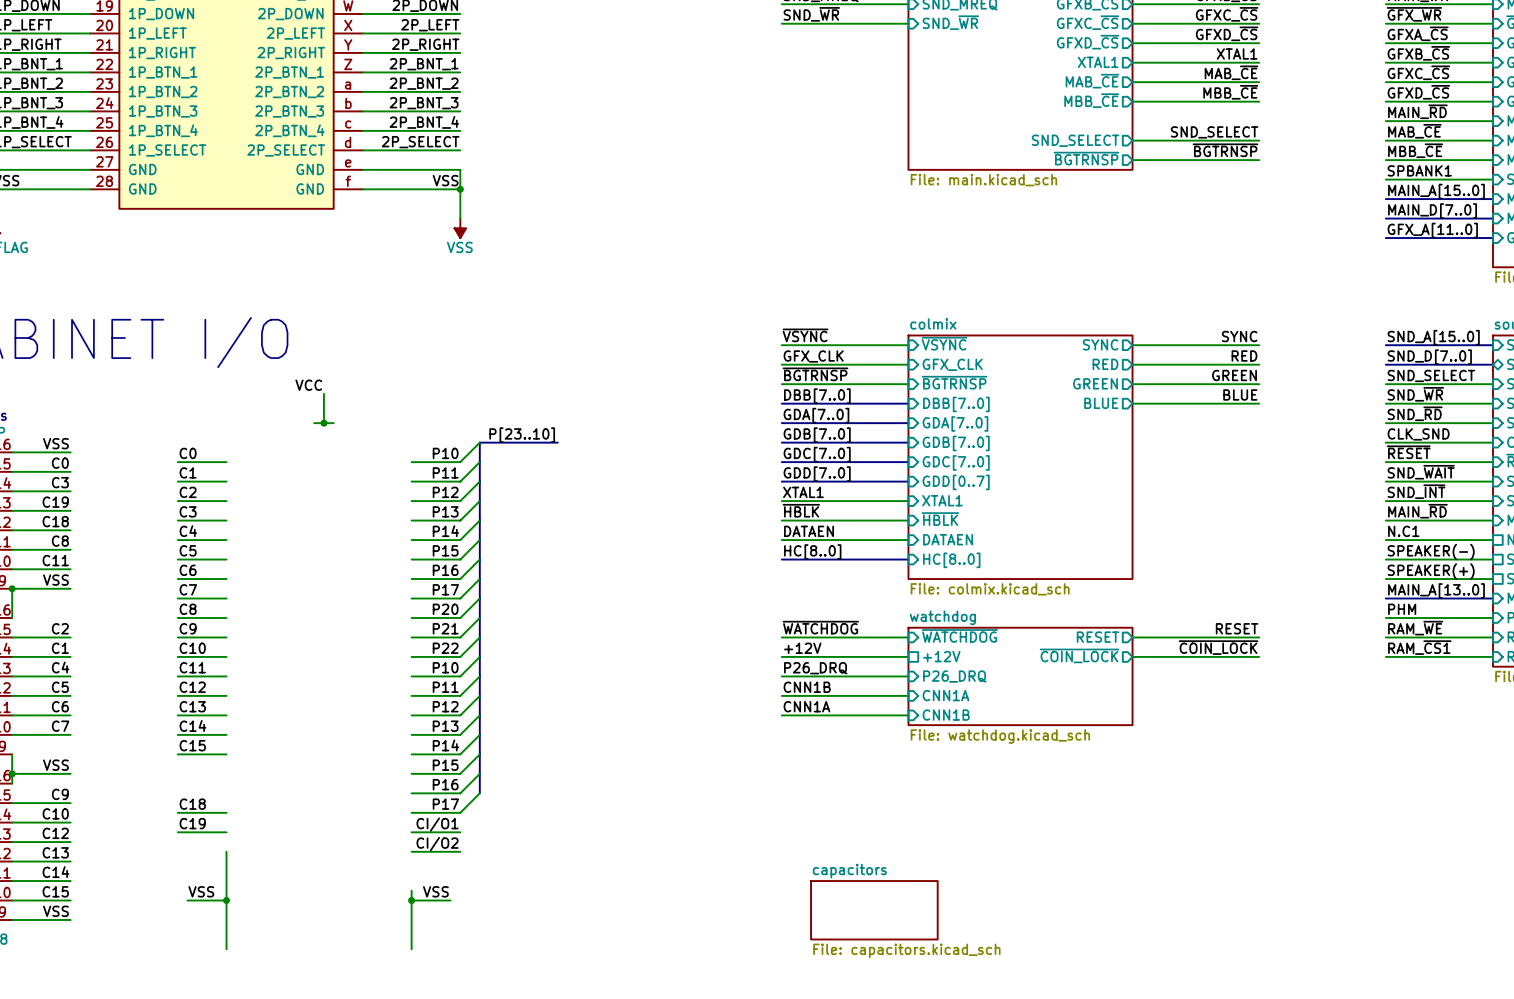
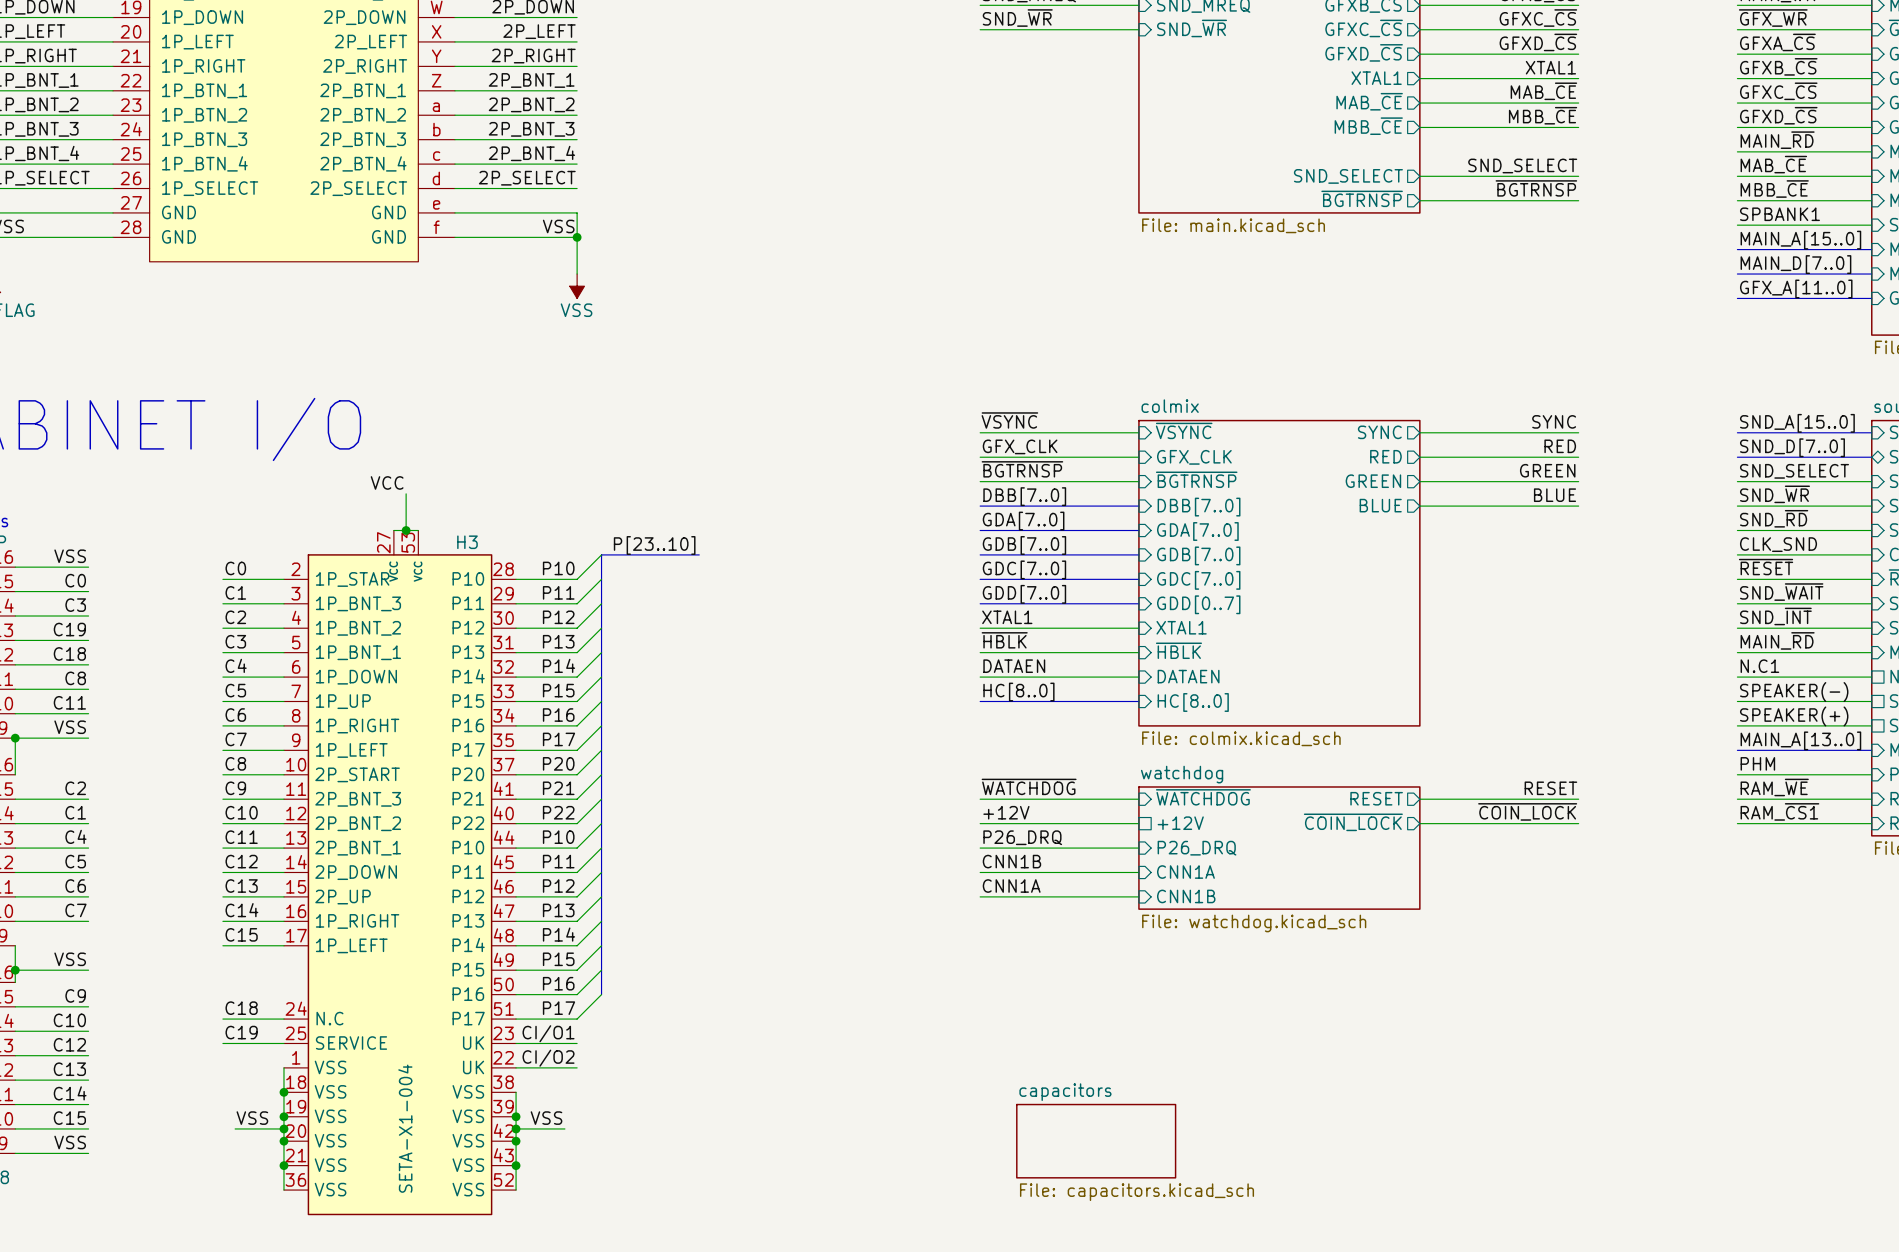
H3: none -> SETA-X1-004 (400, 872)
junction: none -> (283, 1092)
wire: none -> (516, 1092) (516, 1116)
junction: none -> (283, 1116)
junction: none -> (516, 1116)
junction: none -> (283, 1141)
junction: none -> (516, 1141)
junction: none -> (283, 1165)
junction: none -> (516, 1165)

